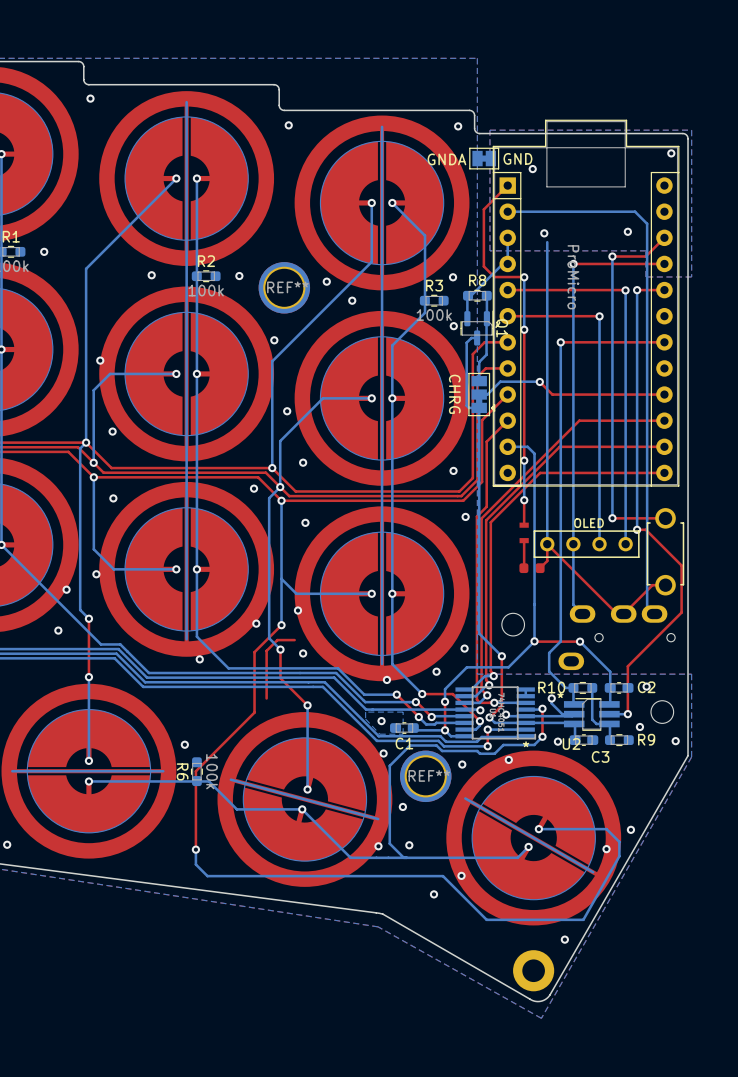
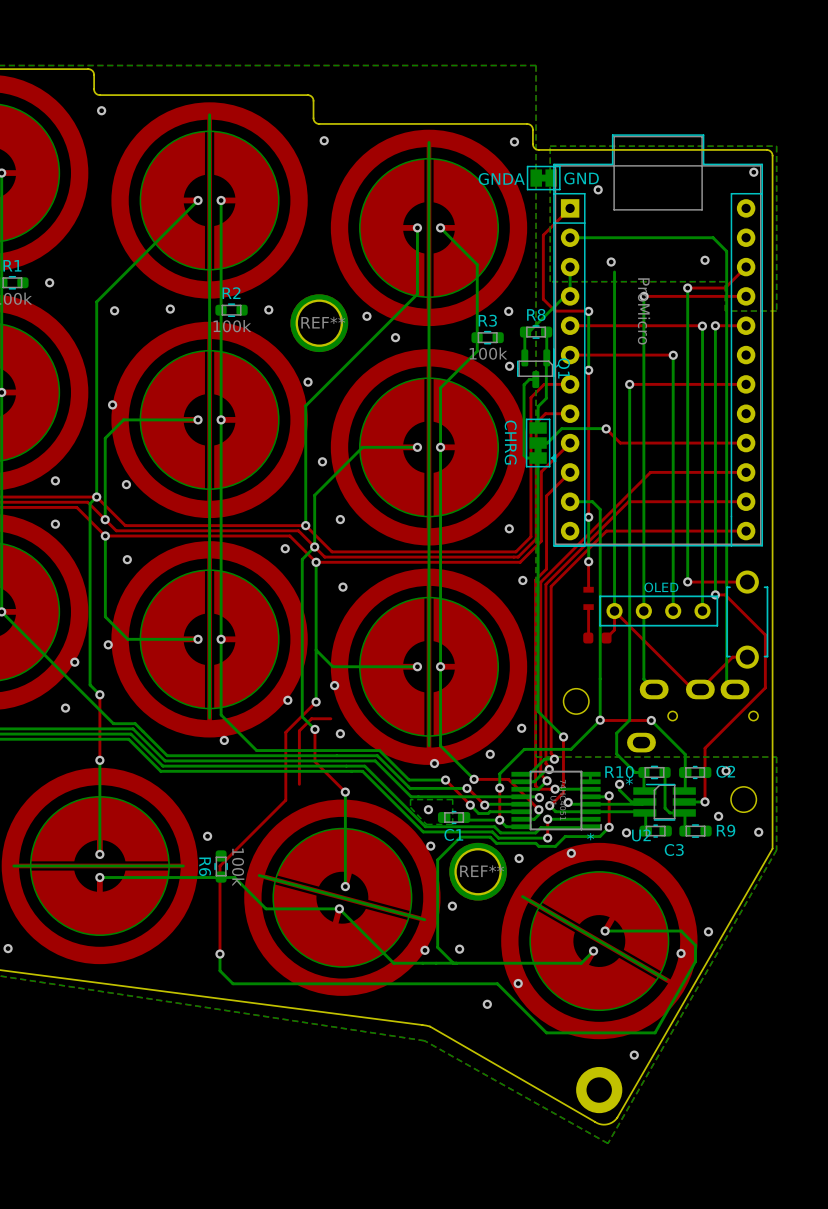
via: none -> (114, 310)
via: none -> (55, 480)
via: none -> (55, 524)

